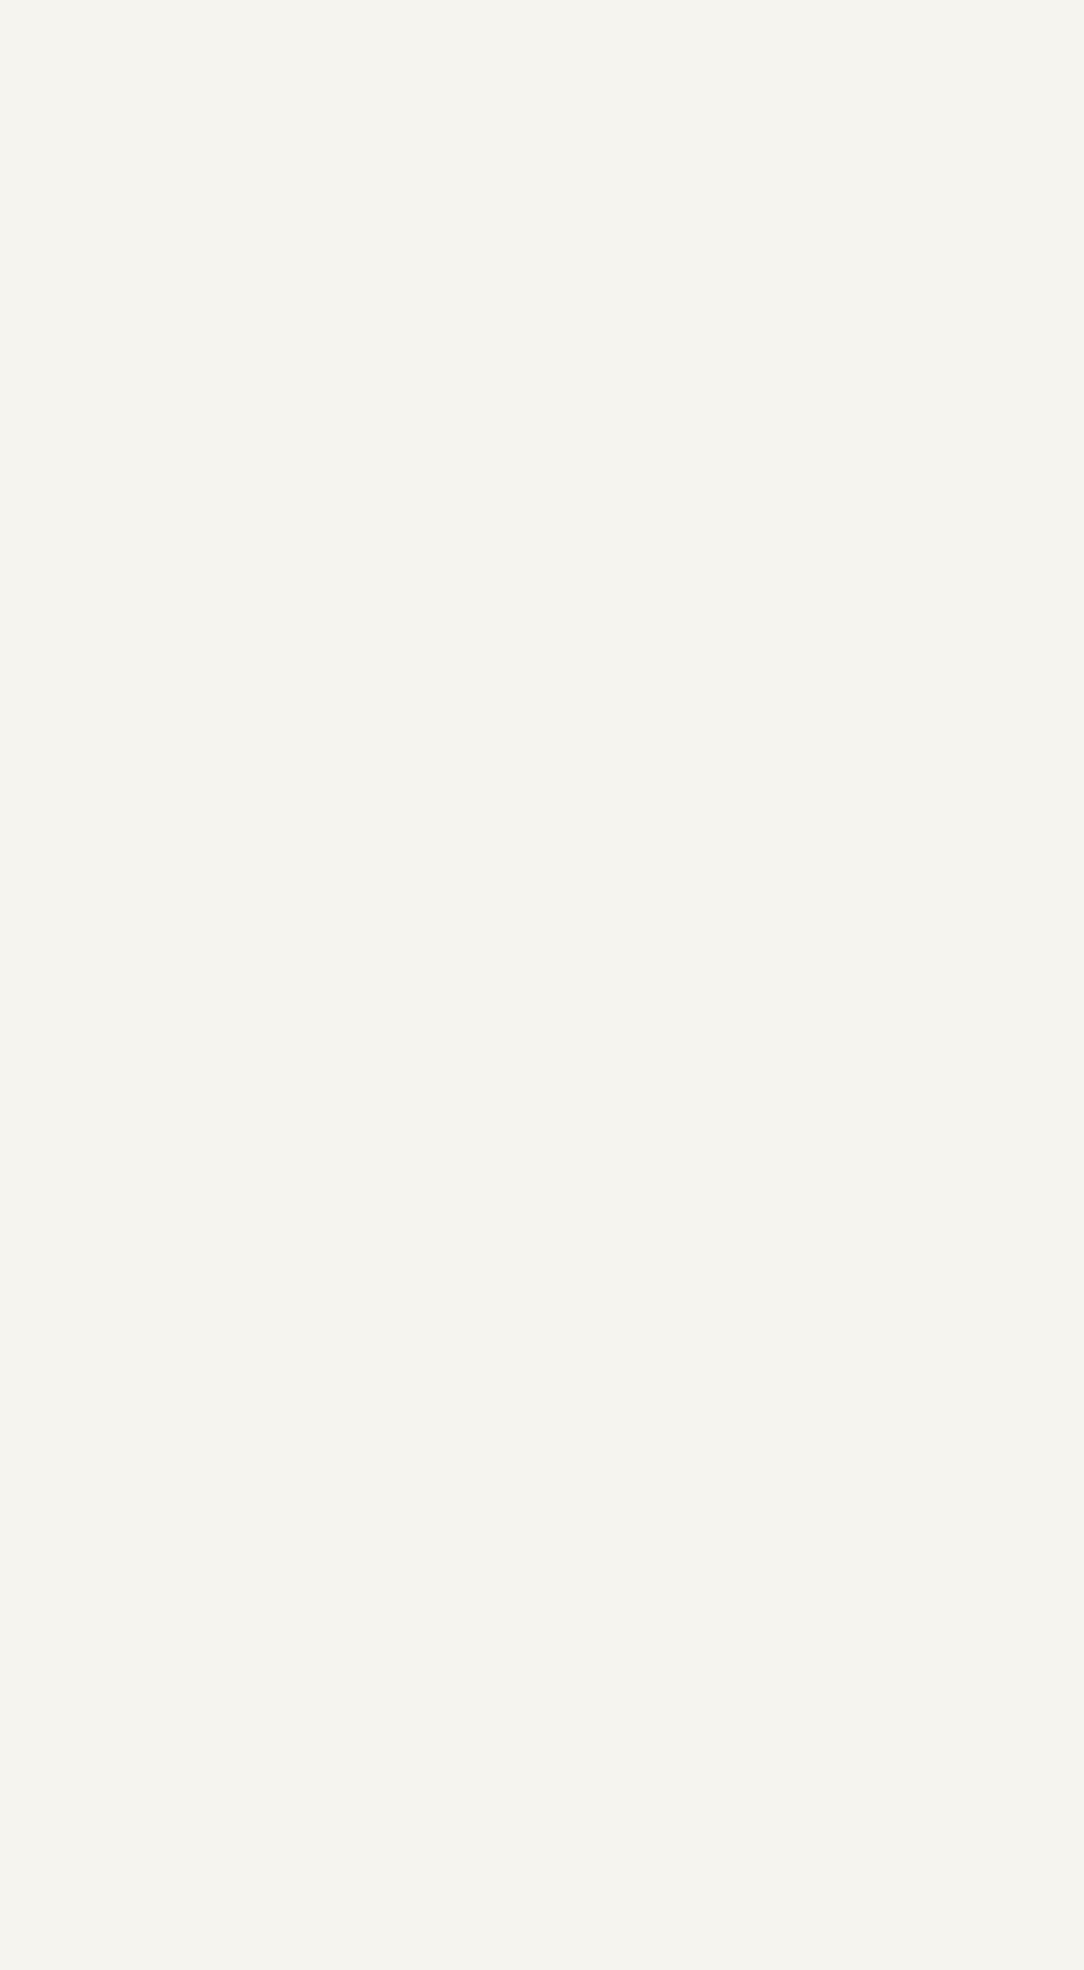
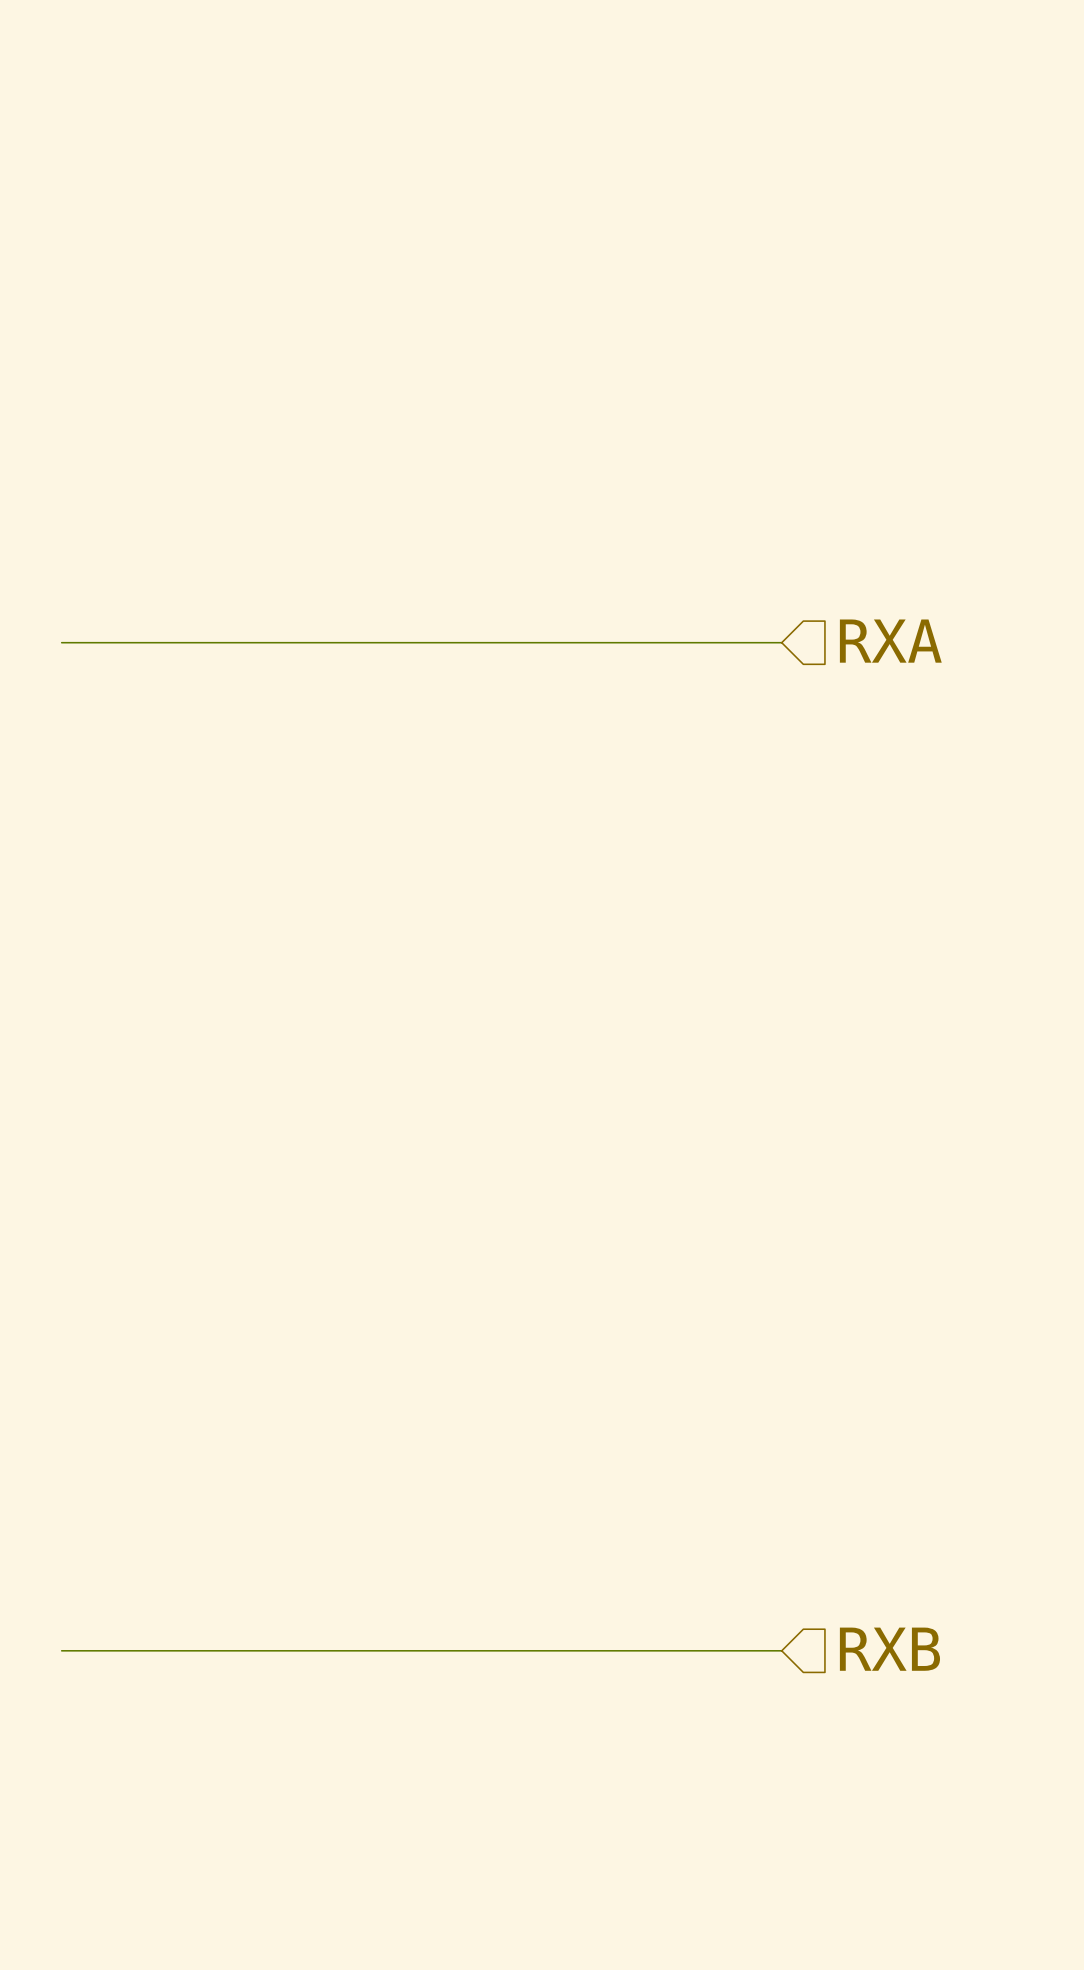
hierarchical label: none -> RXA (890, 641)
wire: none -> (61, 642) (781, 642)
hierarchical label: none -> RXB (889, 1649)
wire: none -> (61, 1650) (781, 1650)

